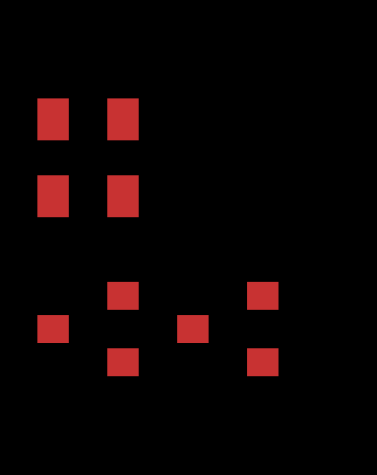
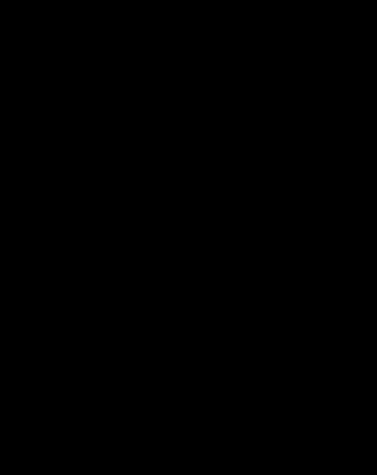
part: (53, 157) -> none
part: (122, 157) -> none
part: (88, 329) -> none
part: (227, 329) -> none

